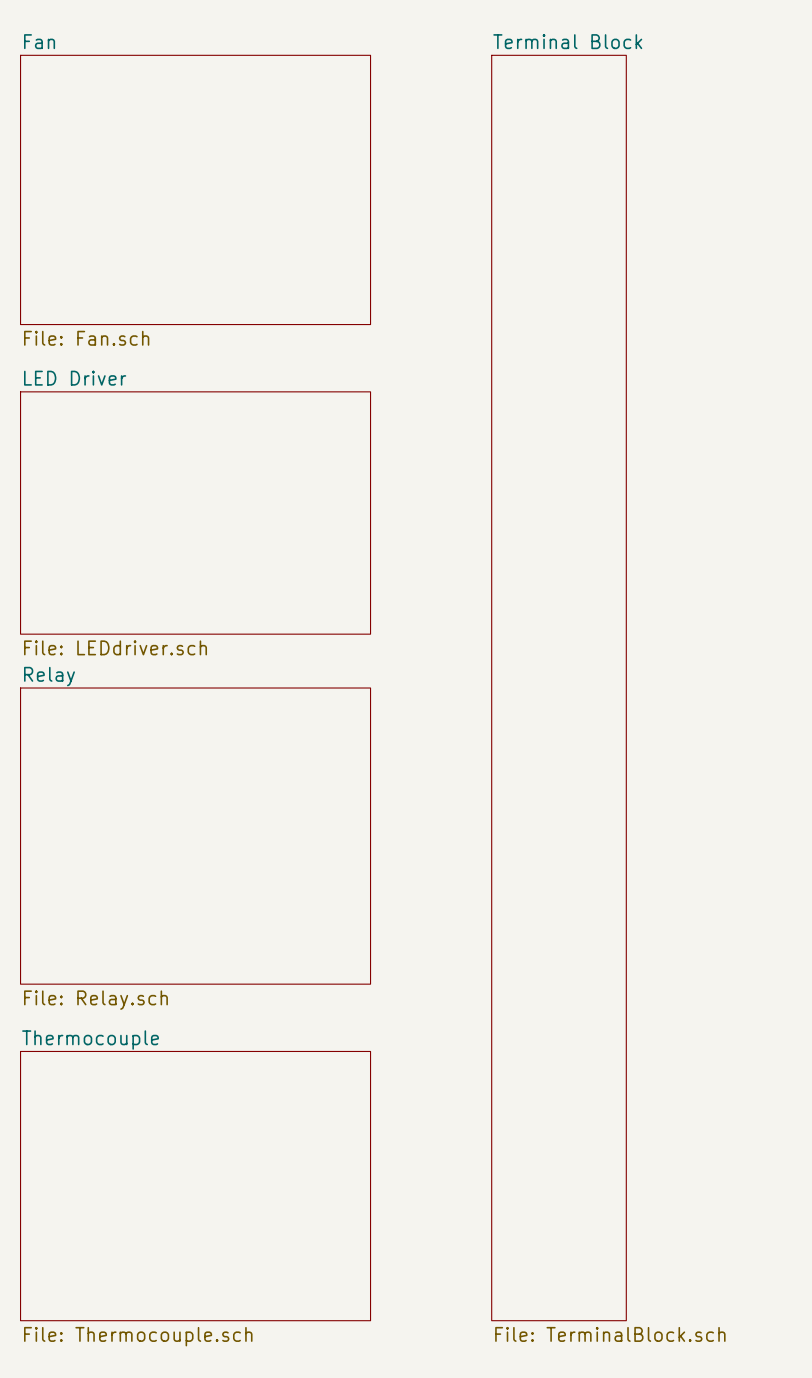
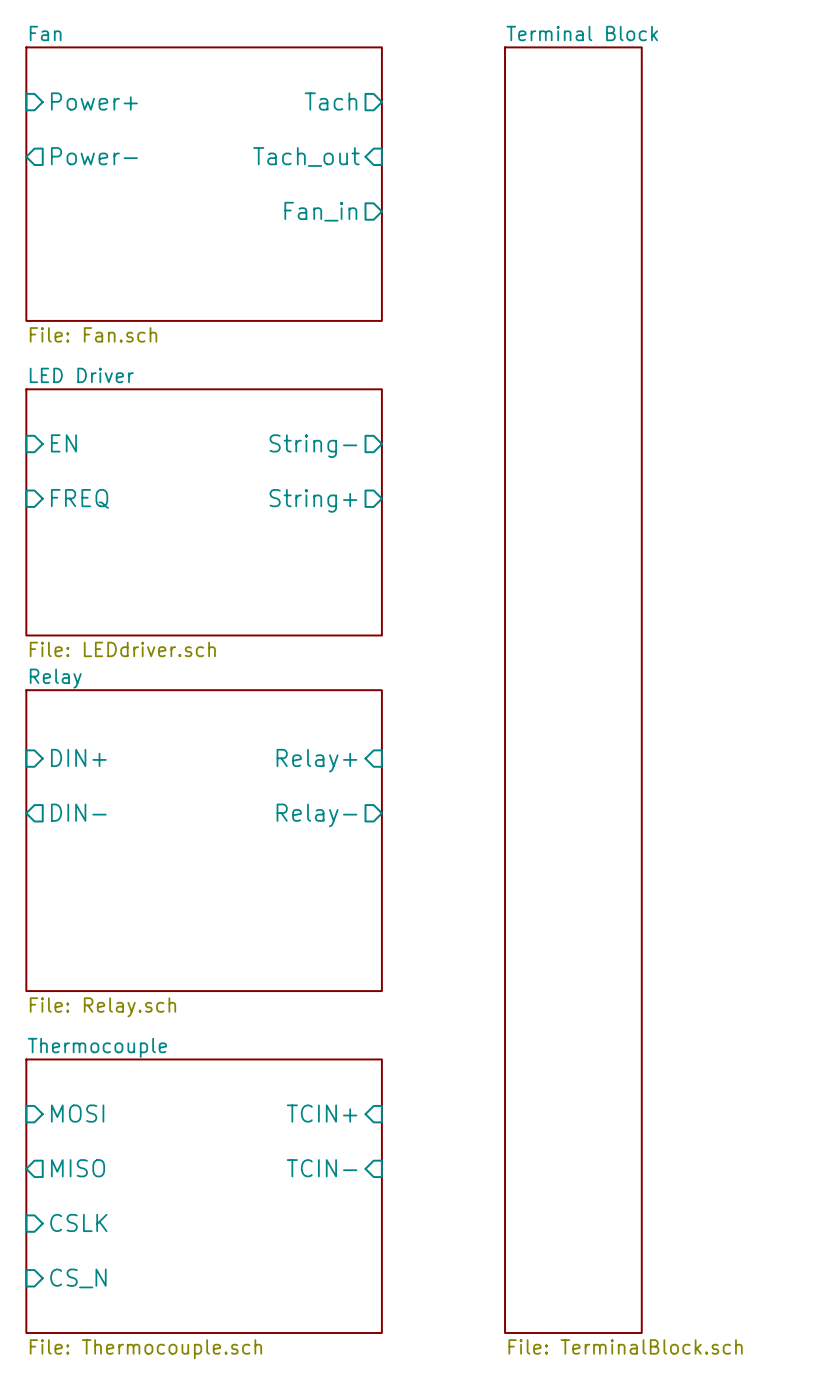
sheet pin: none -> Power+ (94, 101)
sheet pin: none -> Tach (331, 101)
sheet pin: none -> Power- (94, 156)
sheet pin: none -> Tach_out (306, 156)
sheet pin: none -> Fan_in (320, 211)
sheet pin: none -> EN (63, 443)
sheet pin: none -> String- (313, 446)
sheet pin: none -> FREQ (79, 498)
sheet pin: none -> String+ (313, 500)
sheet pin: none -> DIN+ (78, 757)
sheet pin: none -> Relay+ (316, 760)
sheet pin: none -> DIN- (78, 812)
sheet pin: none -> Relay- (316, 815)
sheet pin: none -> MOSI (77, 1113)
sheet pin: none -> TCIN+ (322, 1113)
sheet pin: none -> MISO (78, 1168)
sheet pin: none -> TCIN- (322, 1168)
sheet pin: none -> CSLK (78, 1222)
sheet pin: none -> CS_N (78, 1278)

